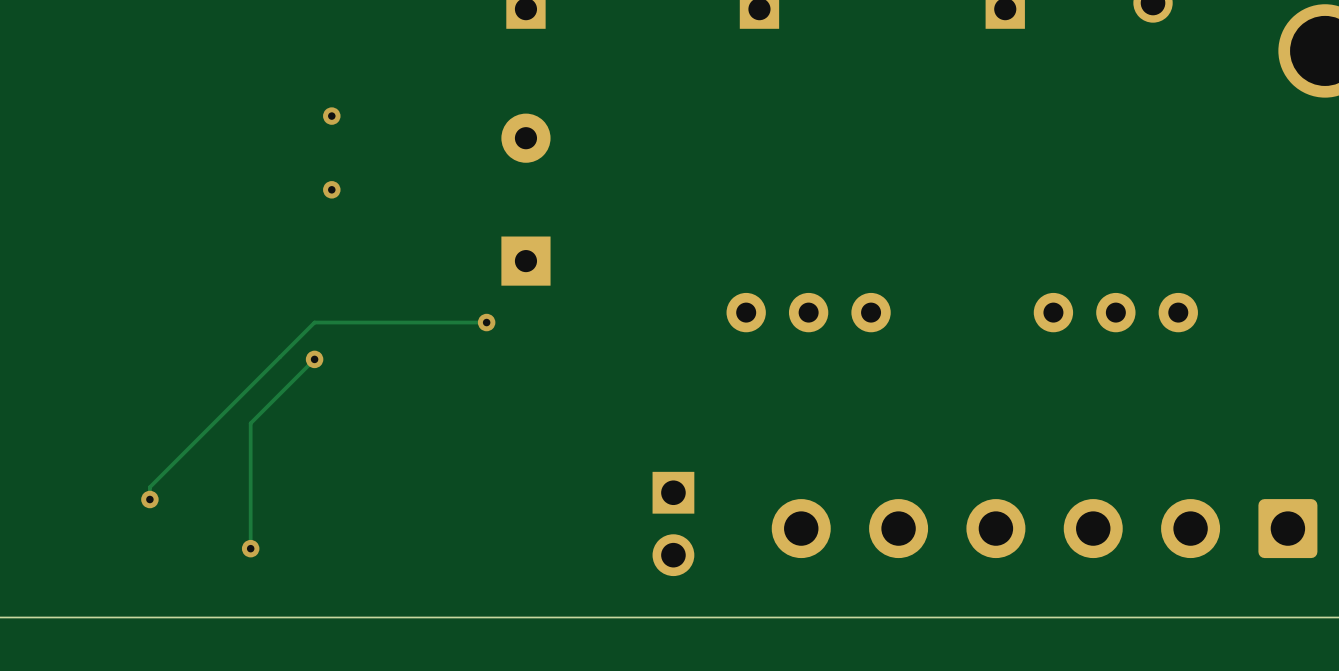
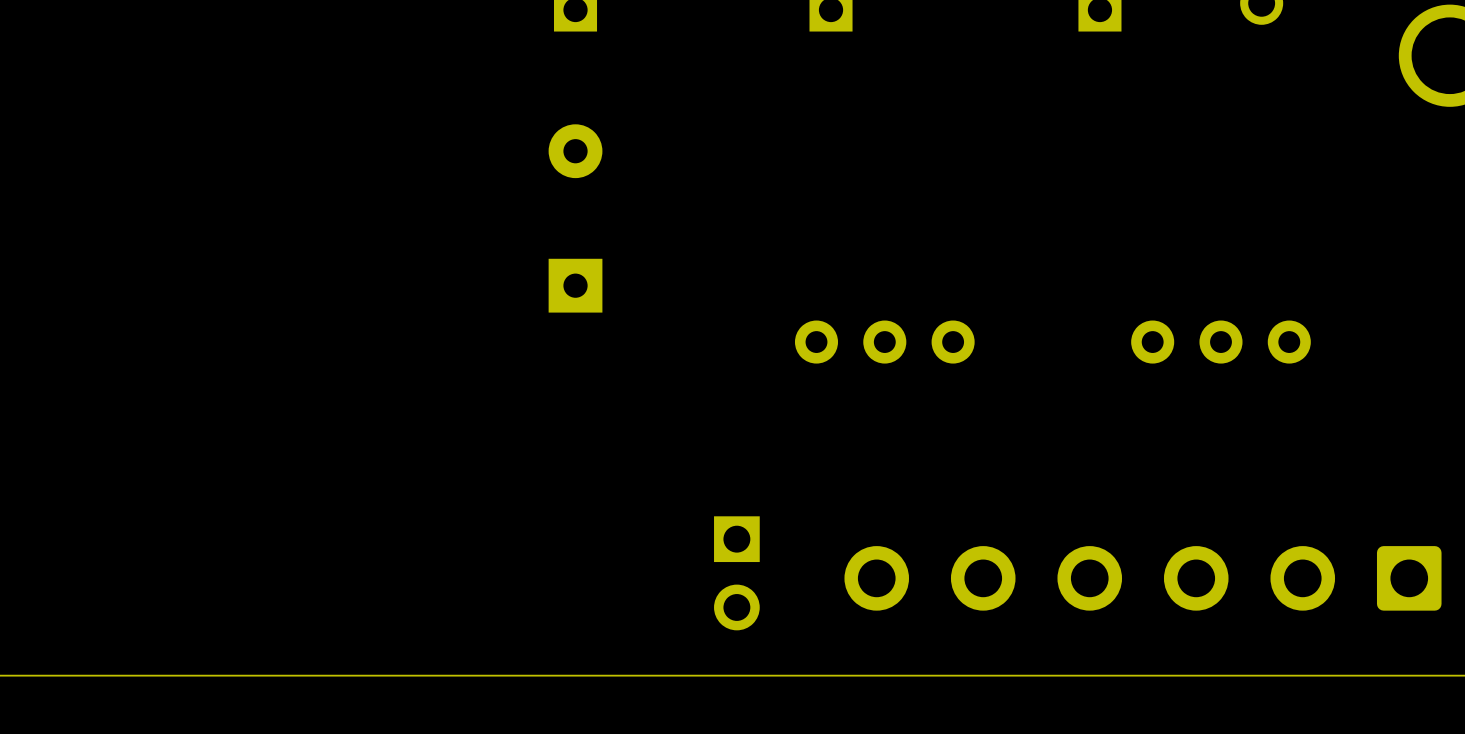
via: (331, 116) -> none
via: (331, 189) -> none
track: (486, 322) (314, 322) (149, 487) (149, 499) -> none
via: (486, 322) -> none
track: (314, 359) (250, 423) (250, 548) -> none
via: (314, 359) -> none
via: (149, 499) -> none
via: (250, 548) -> none

